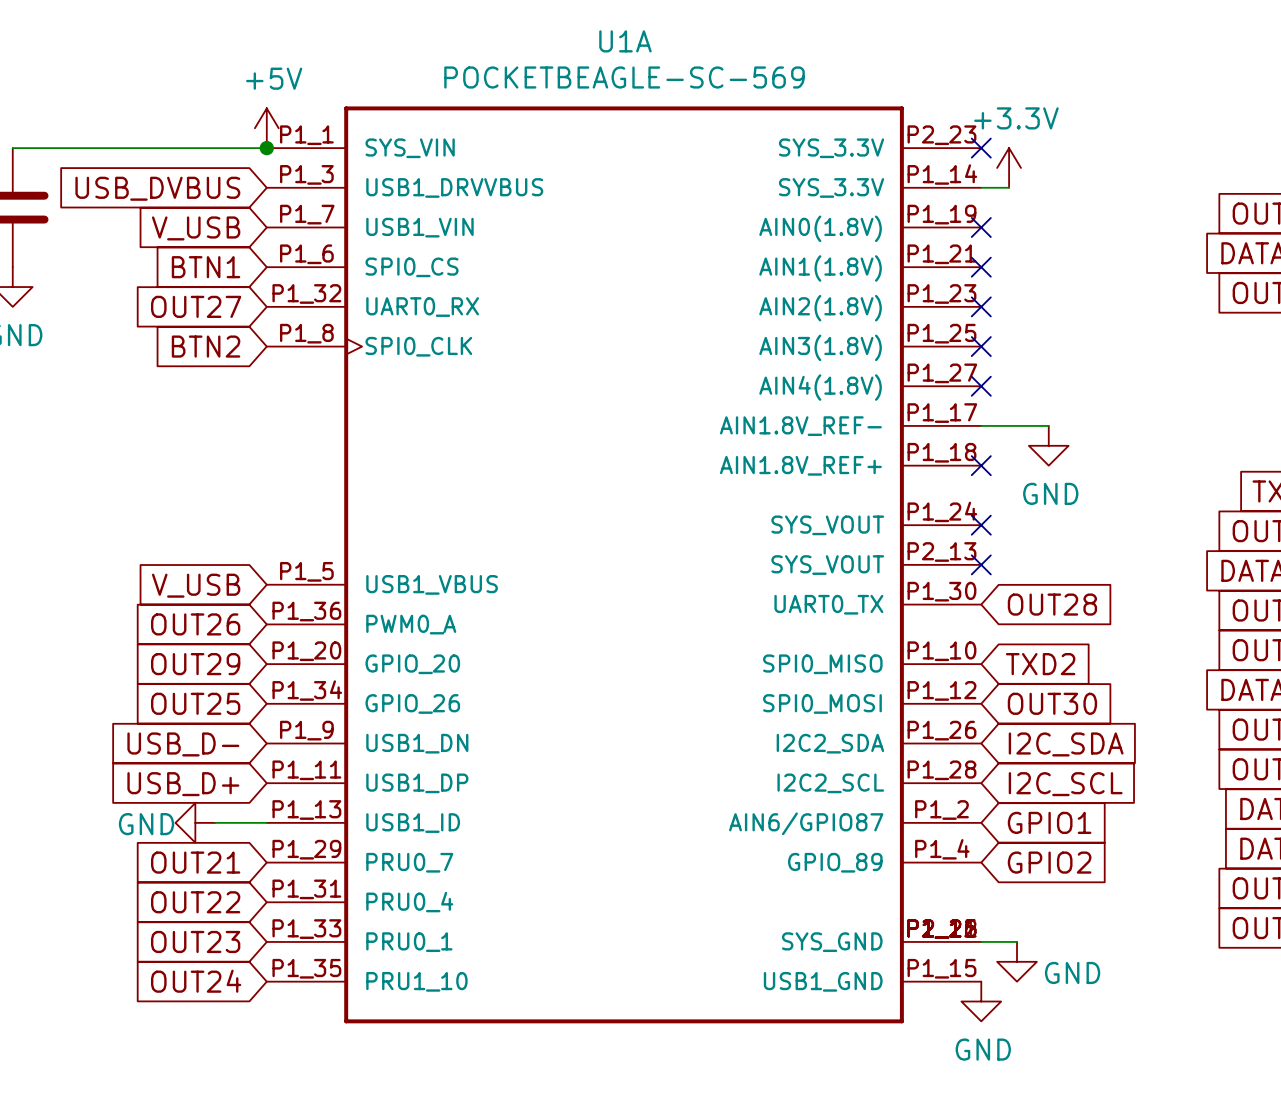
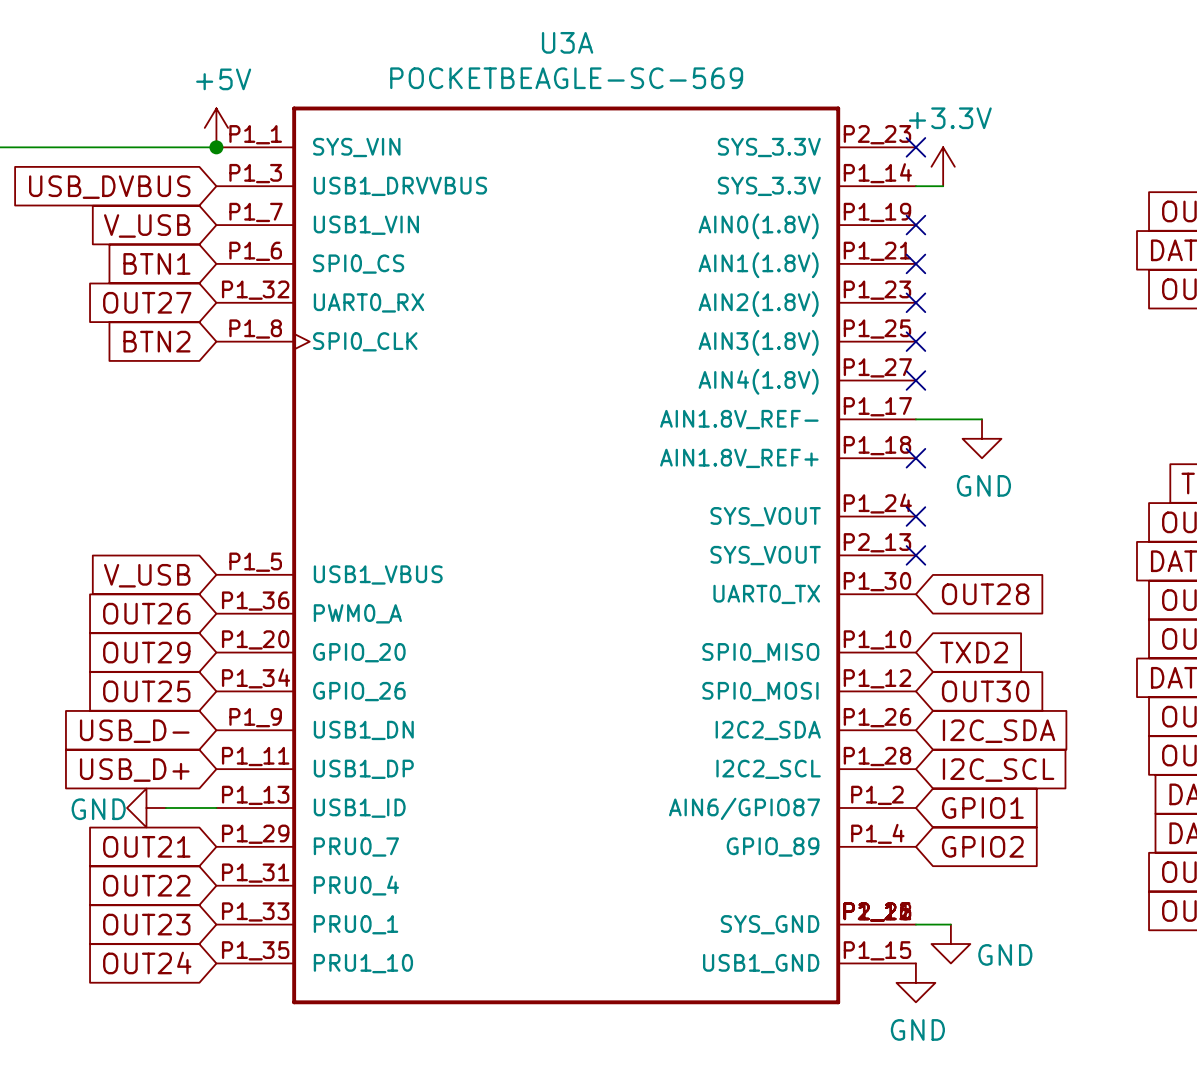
U1A name: U1A (625, 41) -> U3A (567, 42)

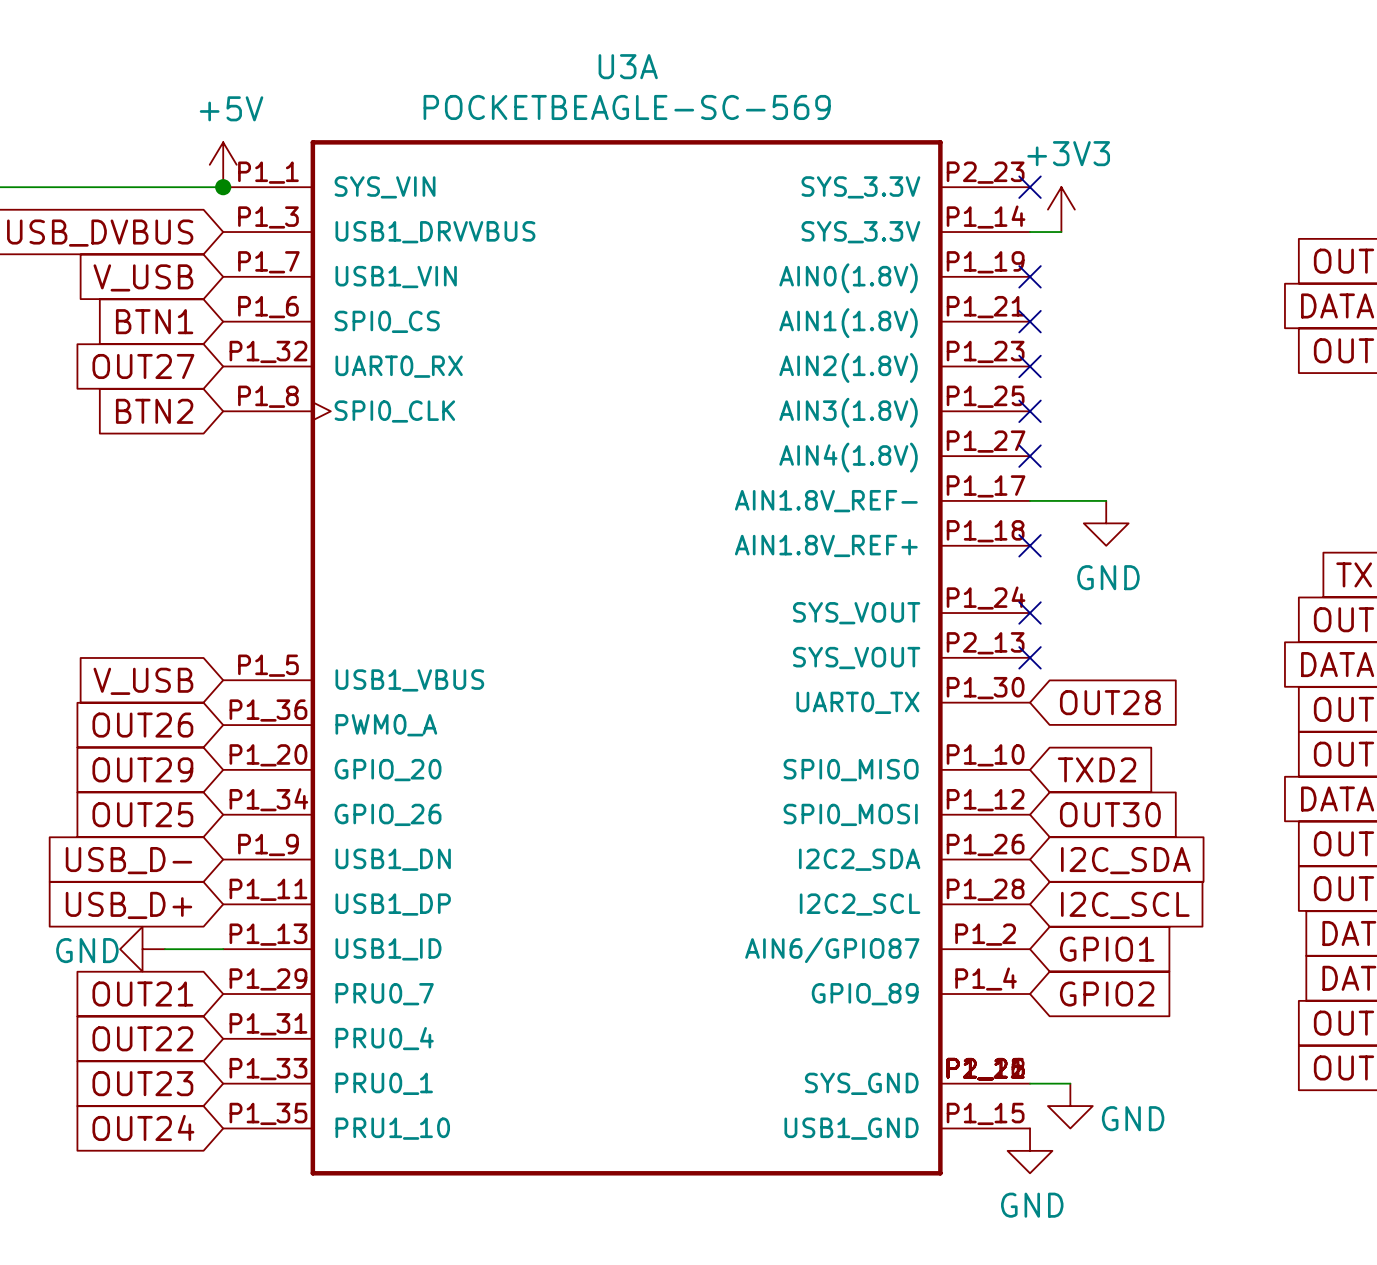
power symbol: +3.3V (943, 166) -> +3V3 (1061, 209)

